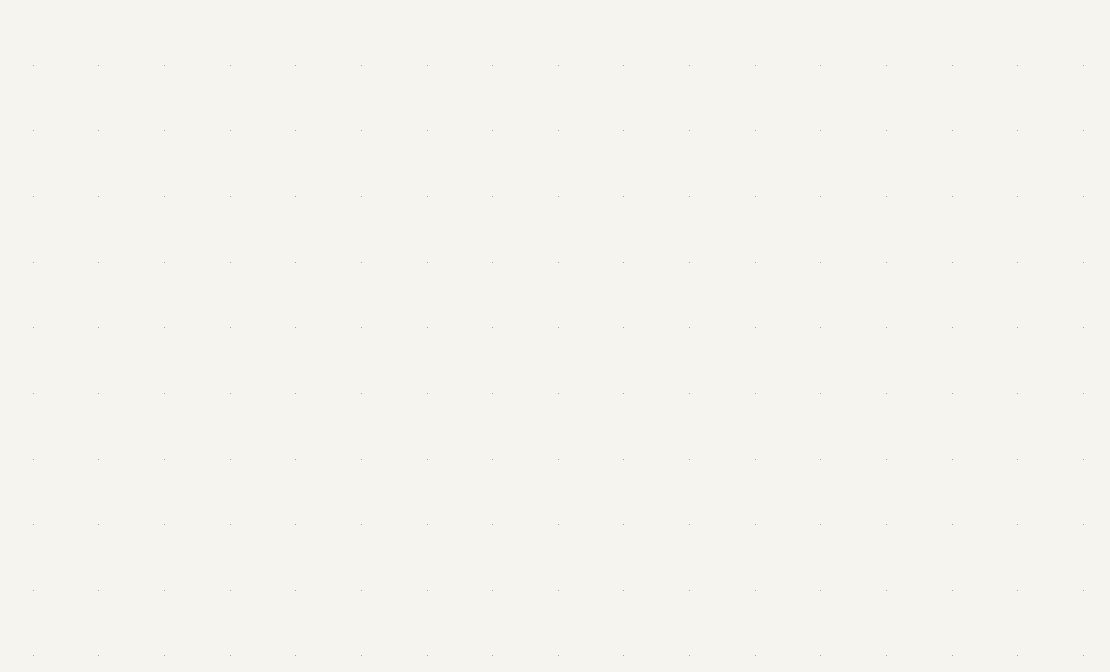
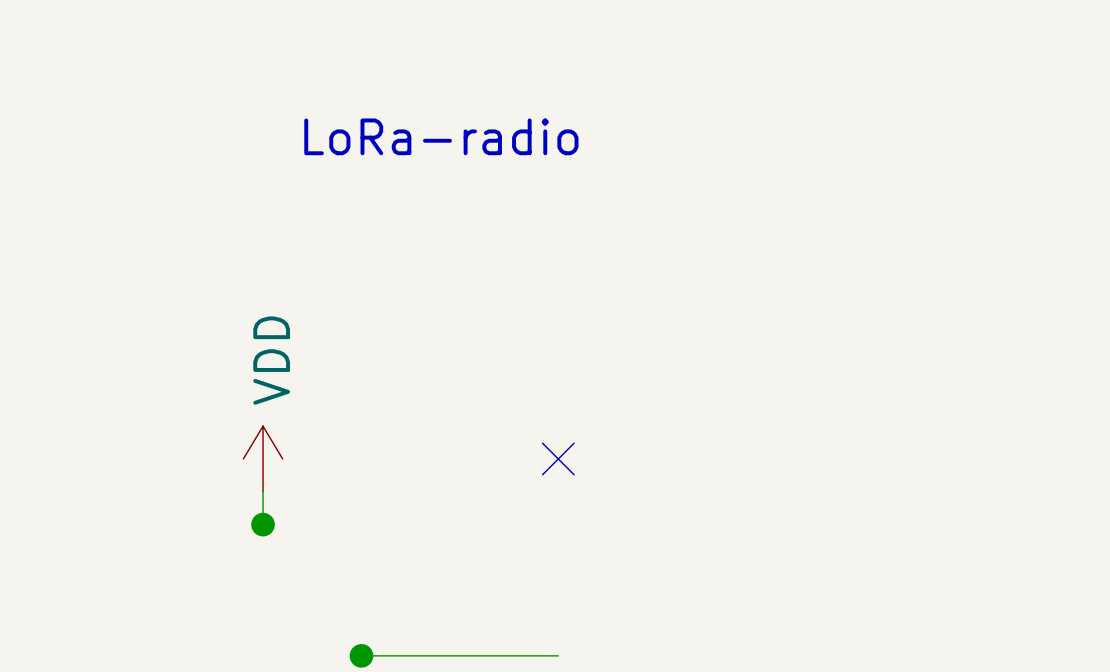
text: none -> LoRa-radio (441, 136)
power symbol: none -> VDD (263, 459)
no-connect mark: none -> (558, 459)
wire: none -> (263, 491) (263, 524)
junction: none -> (263, 524)
wire: none -> (361, 655) (558, 655)
junction: none -> (361, 655)

